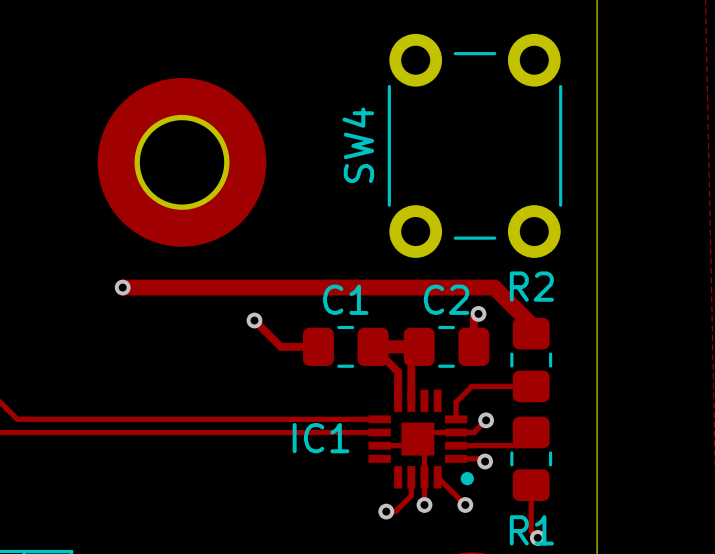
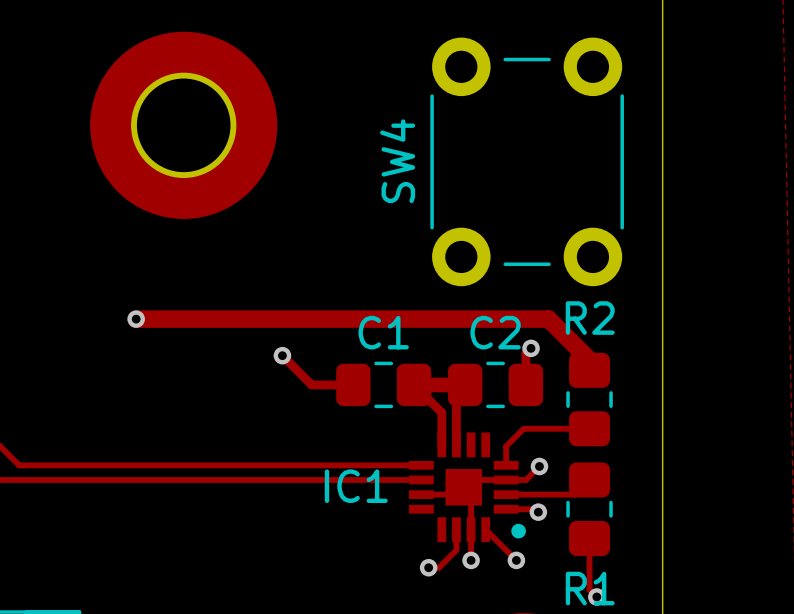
part position: (182, 162) -> (183, 125)

